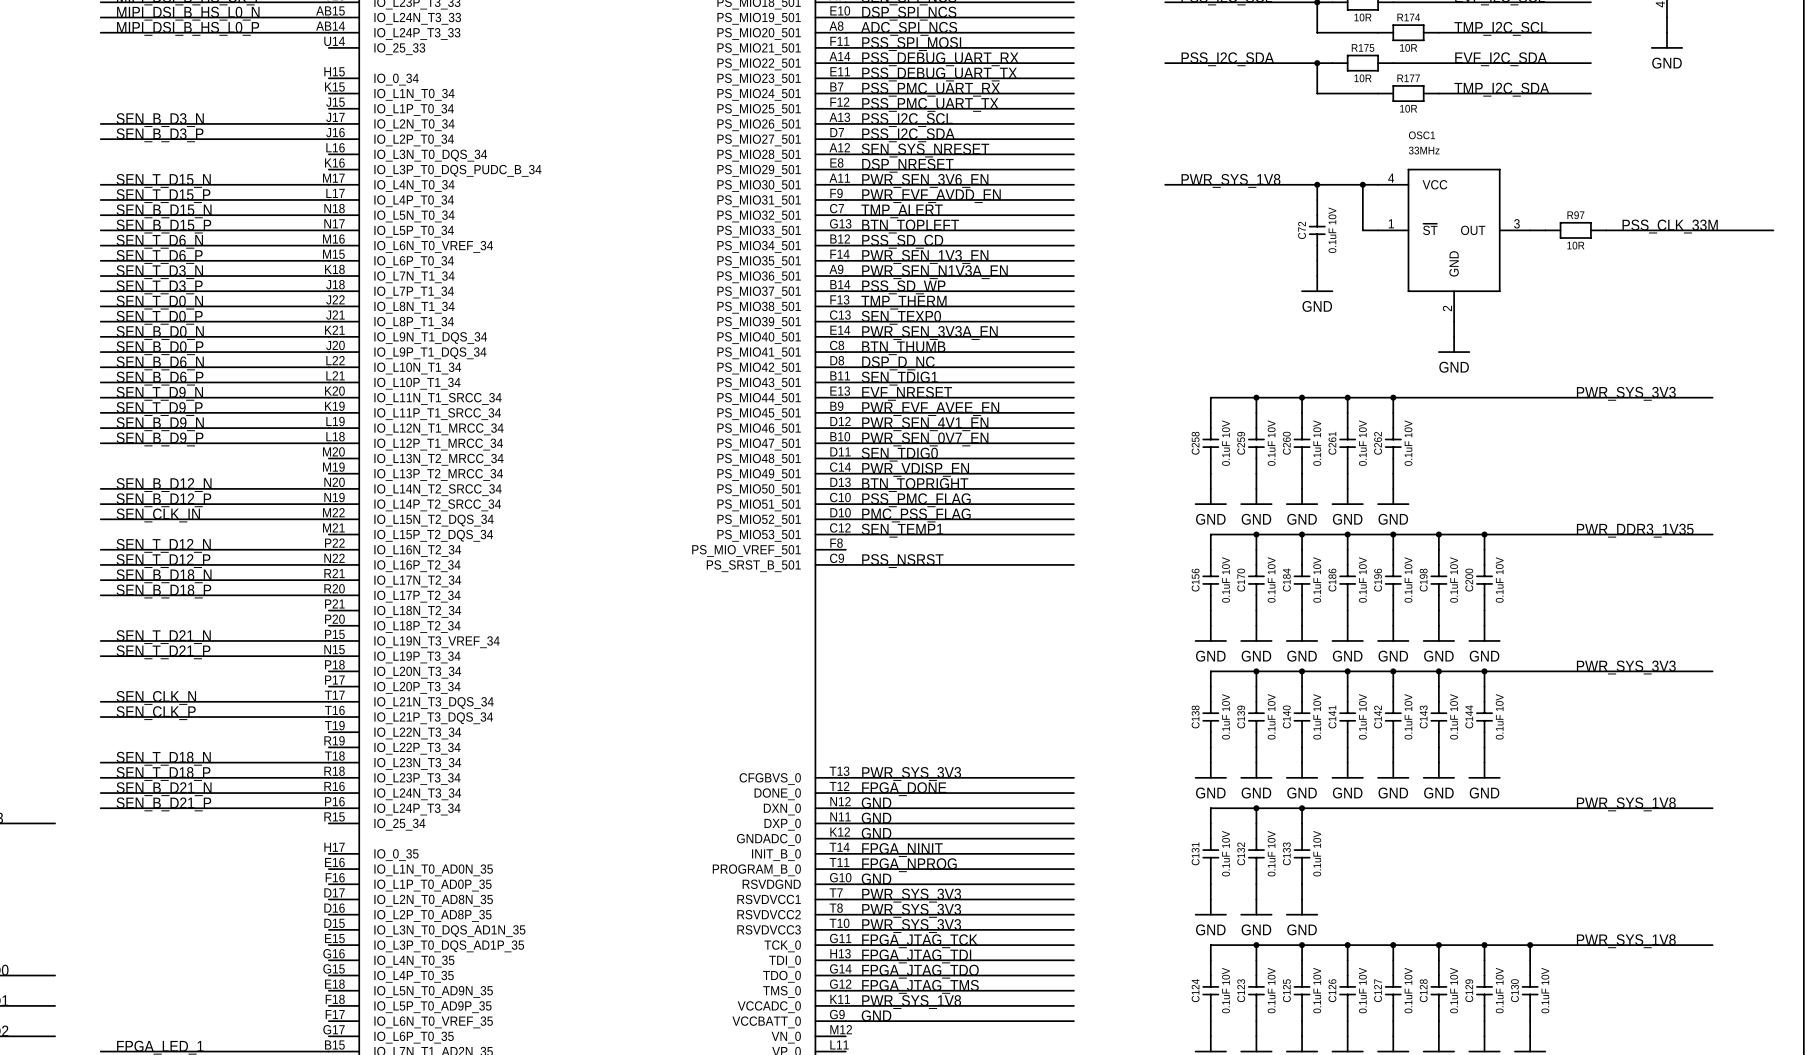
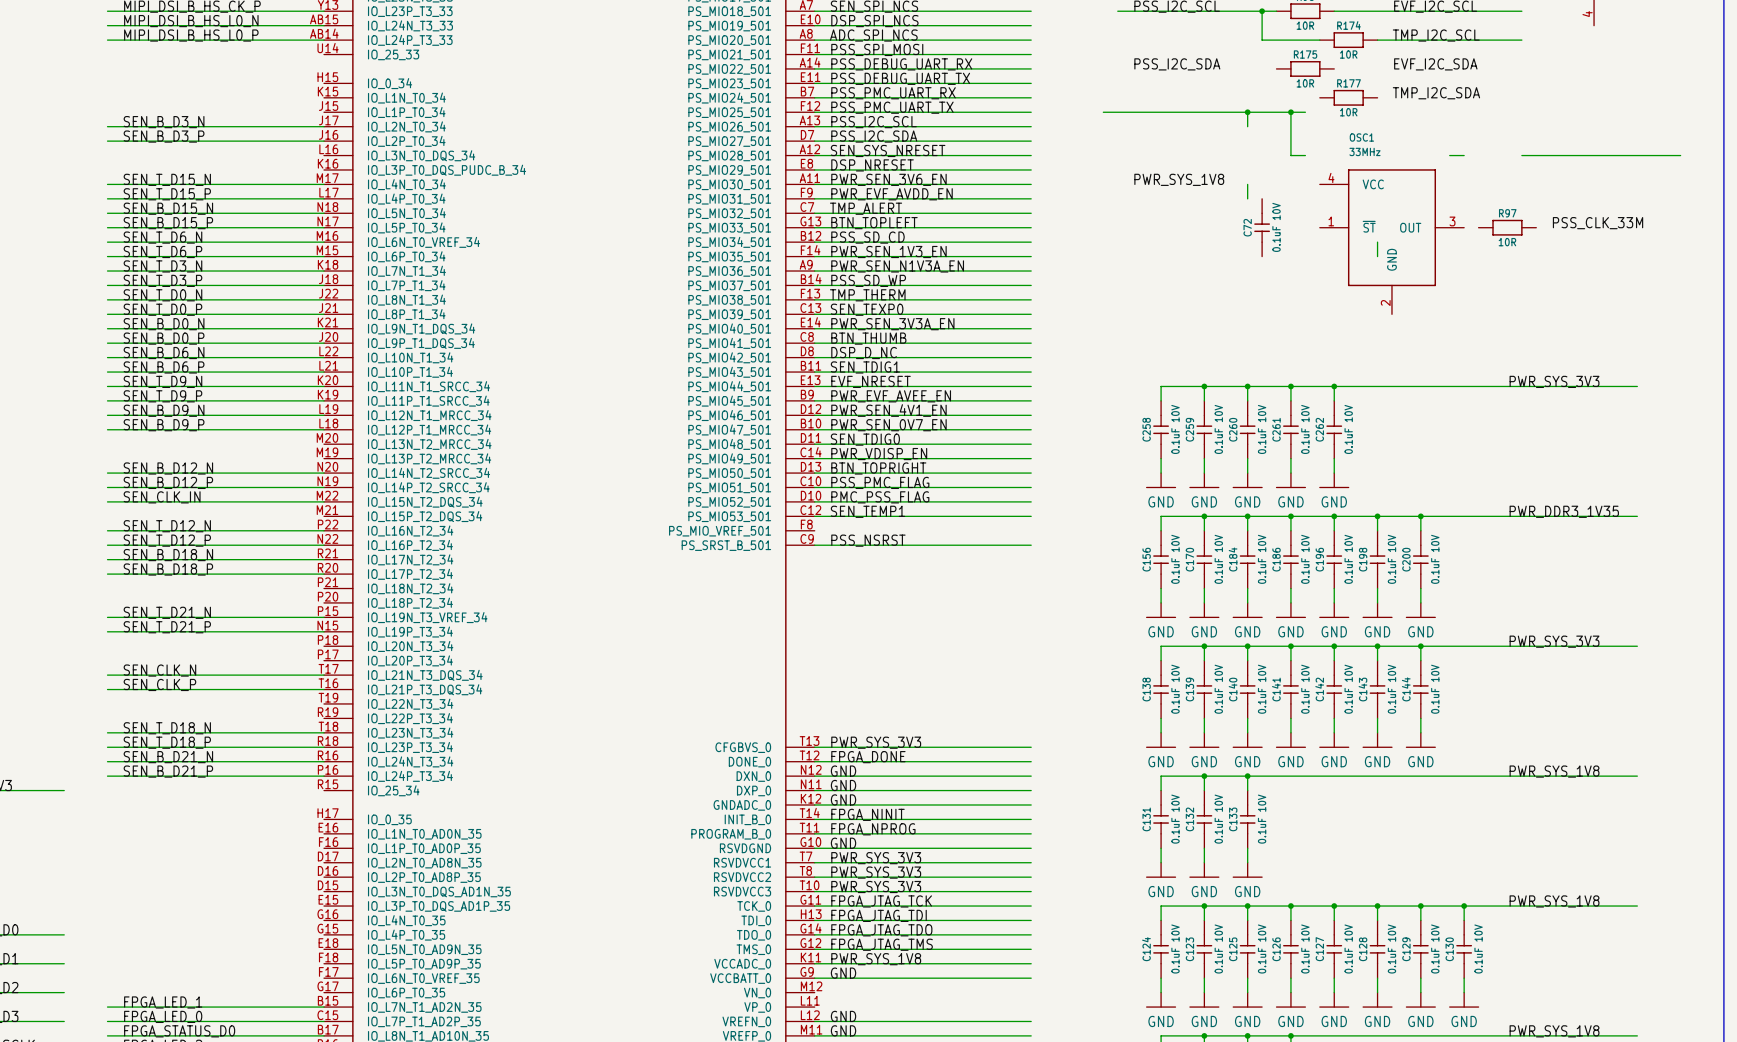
wire: (1666, 17) (1666, 32) -> none
power symbol: GND (1666, 40) -> none
wire: (1165, 63) (1332, 63) -> none
wire: (1317, 63) (1317, 93) (1378, 93) -> none
junction: (1317, 63) -> none
wire: (1393, 63) (1590, 63) -> none
wire: (1438, 93) (1590, 93) -> none
junction: none -> (1247, 112)
junction: none -> (1290, 112)
wire: (1165, 184) (1378, 184) -> (1103, 112) (1305, 112)
wire: (1317, 184) (1317, 199) -> (1247, 112) (1247, 126)
junction: (1317, 184) -> none
wire: (1362, 184) (1362, 230) (1378, 230) -> (1290, 112) (1290, 155) (1305, 155)
junction: (1362, 184) -> none
wire: (1530, 230) (1545, 230) -> (1449, 155) (1464, 155)
wire: (1606, 230) (1773, 230) -> (1521, 155) (1680, 155)
wire: (1317, 260) (1317, 276) -> (1247, 184) (1247, 198)
power symbol: GND (1317, 283) -> none
wire: (1454, 321) (1454, 336) -> (1377, 242) (1377, 256)
power symbol: GND (1454, 344) -> none

